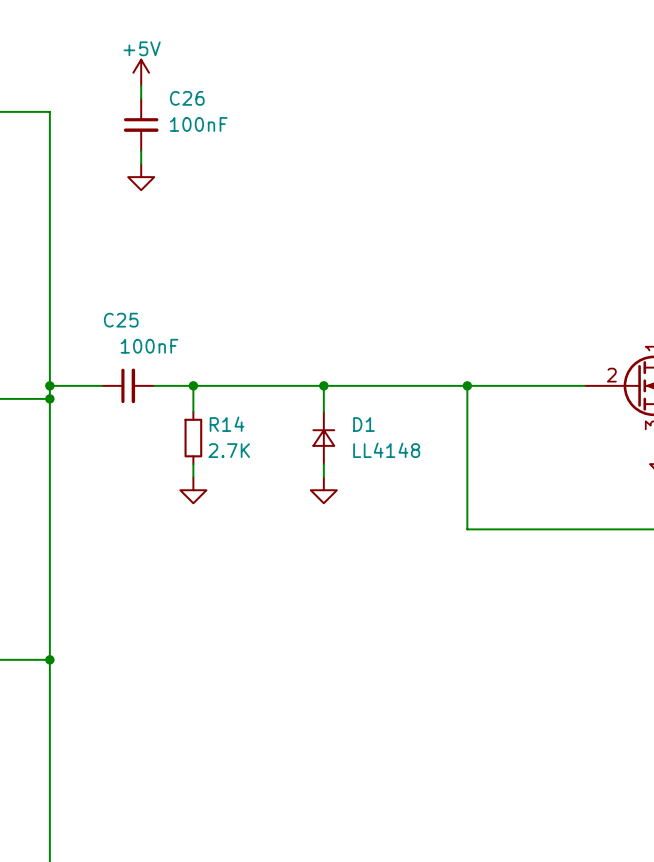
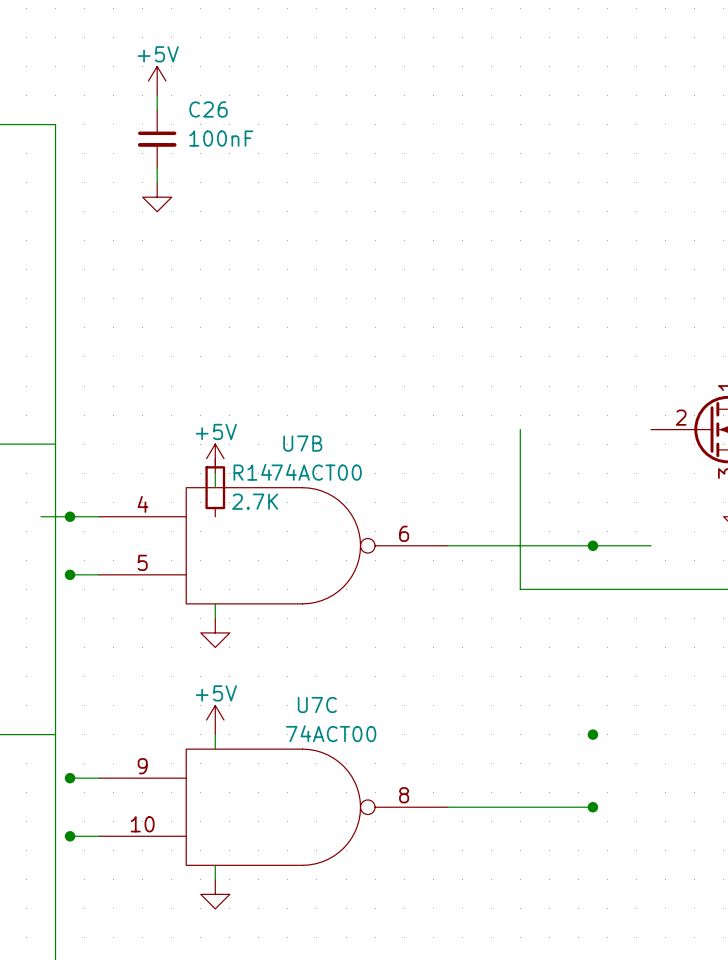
wire: (49, 385) (102, 385) -> (41, 516) (99, 516)
junction: (49, 385) -> none
C25: 100nF (128, 385) -> none
wire: (154, 385) (584, 385) -> none
junction: (193, 385) -> none
wire: (323, 385) (323, 411) -> none
junction: (323, 385) -> none
junction: (467, 385) -> none
junction: (49, 398) -> none
power symbol: none -> +5V (215, 458)
D1: LL4148 (323, 438) -> none
junction: none -> (70, 516)
wire: (193, 464) (193, 477) -> (215, 473) (215, 487)
wire: (323, 464) (323, 477) -> (215, 603) (215, 618)
power symbol: (193, 490) -> none
U7B: none -> 74ACT00 (273, 545)
power symbol: (323, 490) -> none
wire: none -> (447, 545) (651, 545)
junction: none -> (592, 545)
wire: none -> (70, 574) (99, 574)
junction: none -> (70, 574)
power symbol: none -> (215, 632)
power symbol: none -> +5V (215, 720)
junction position: (49, 659) -> (70, 778)
wire: none -> (215, 734) (215, 749)
junction: none -> (592, 734)
wire: none -> (70, 778) (99, 778)
U7C: none -> 74ACT00 (273, 807)
wire: none -> (447, 807) (592, 807)
junction: none -> (592, 807)
wire: none -> (70, 836) (99, 836)
junction: none -> (70, 836)
wire: none -> (215, 865) (215, 879)
power symbol: none -> (215, 894)

